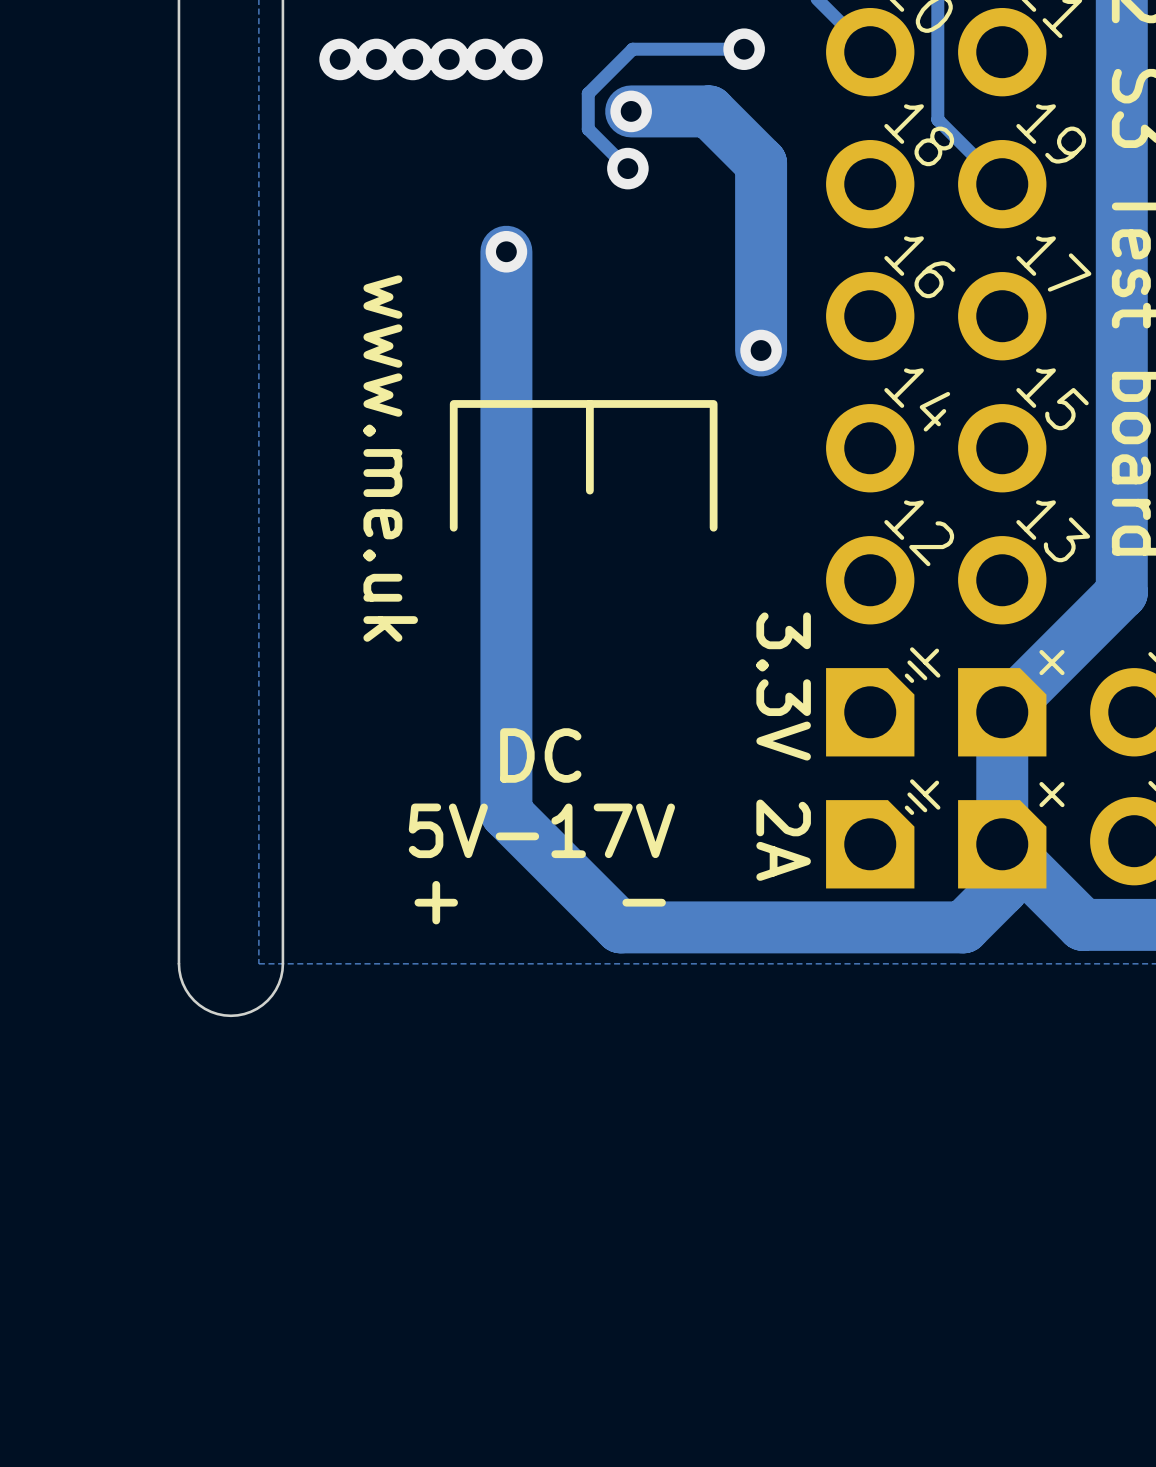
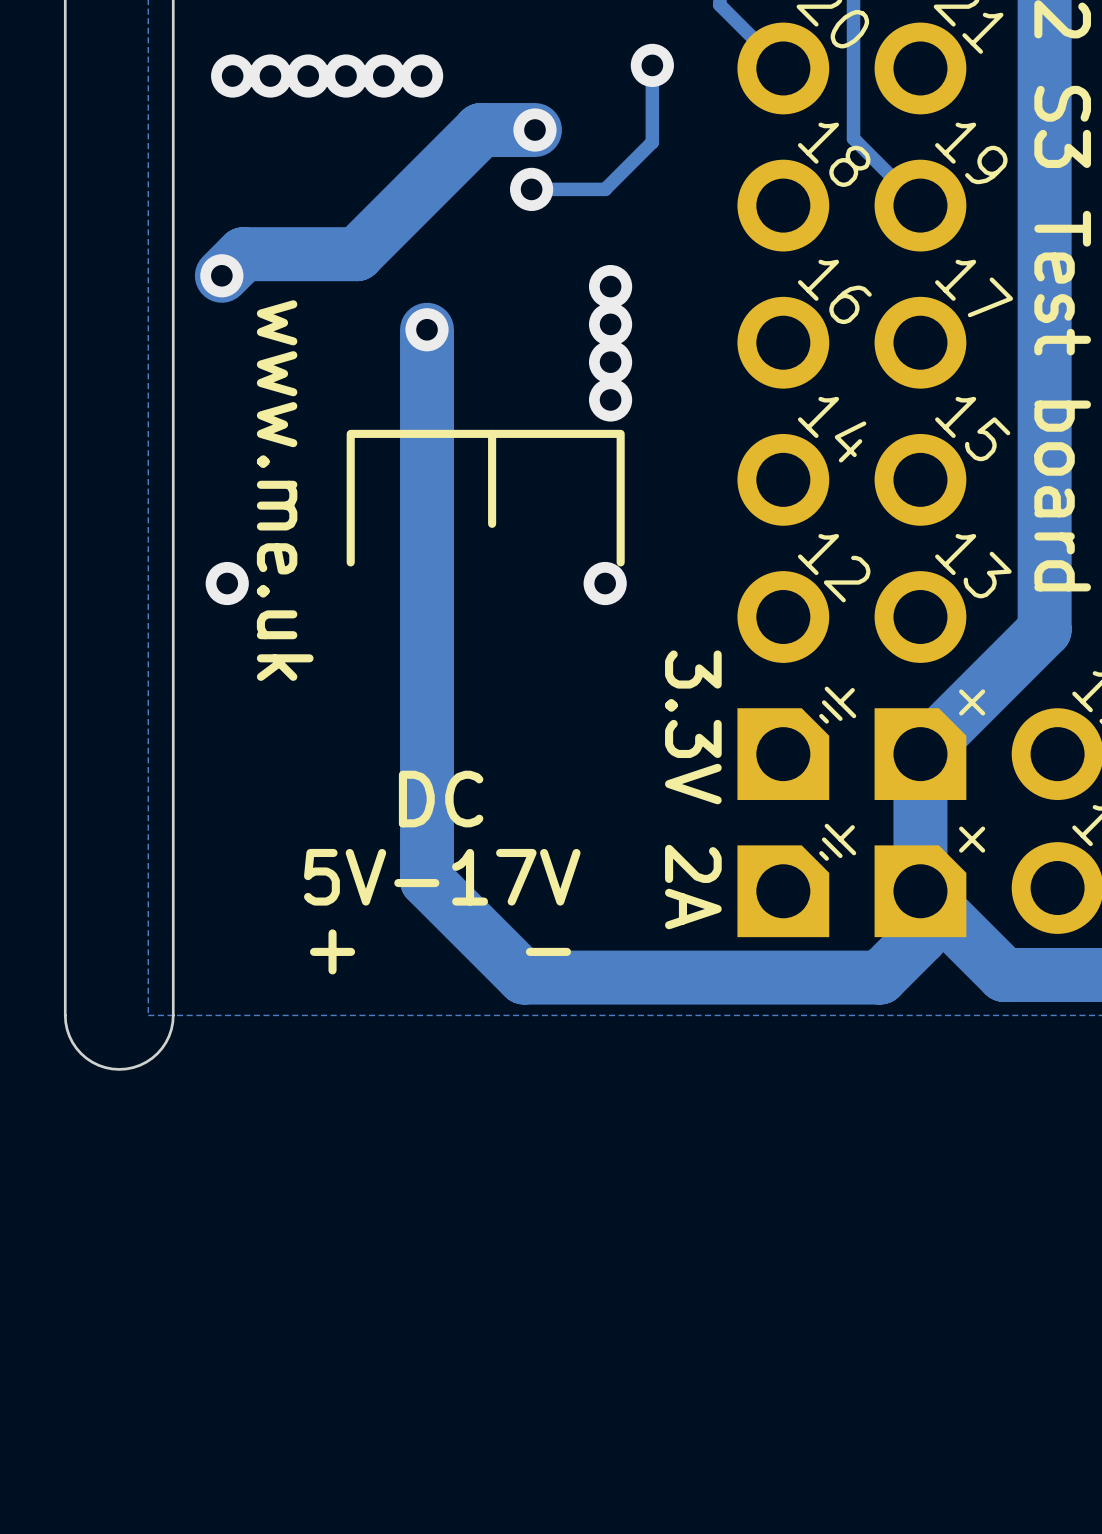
track: (744, 49) (632, 49) (588, 93) (588, 129) (627, 168) -> (652, 65) (652, 142) (605, 189) (531, 189)
track: (631, 111) (709, 111) (761, 163) (761, 350) -> (534, 130) (481, 130) (356, 254) (243, 254) (221, 275)
via: none -> (221, 275)
track: (506, 251) (506, 813) (527, 833) -> (427, 329) (427, 880)
via position: (506, 251) -> (427, 329)
via: none -> (610, 286)
via: none -> (610, 324)
via: none -> (610, 362)
via: (761, 350) -> none
via: none -> (610, 399)
via: none -> (227, 583)
via: none -> (605, 583)

